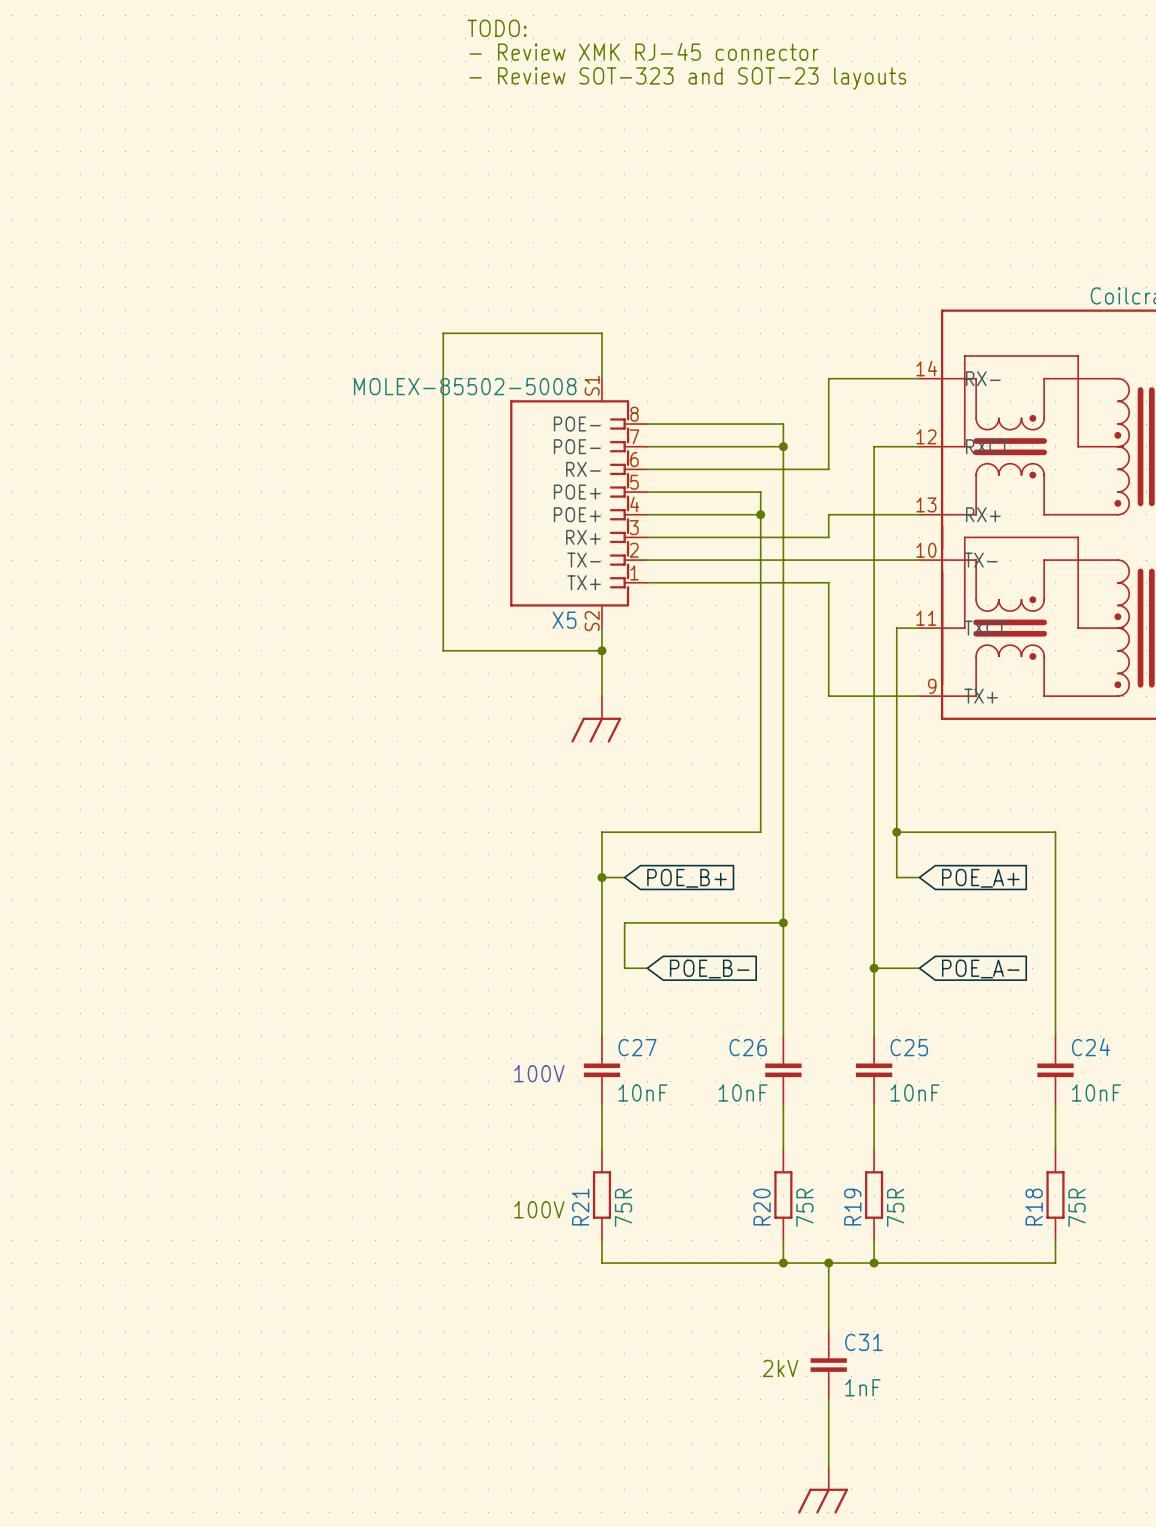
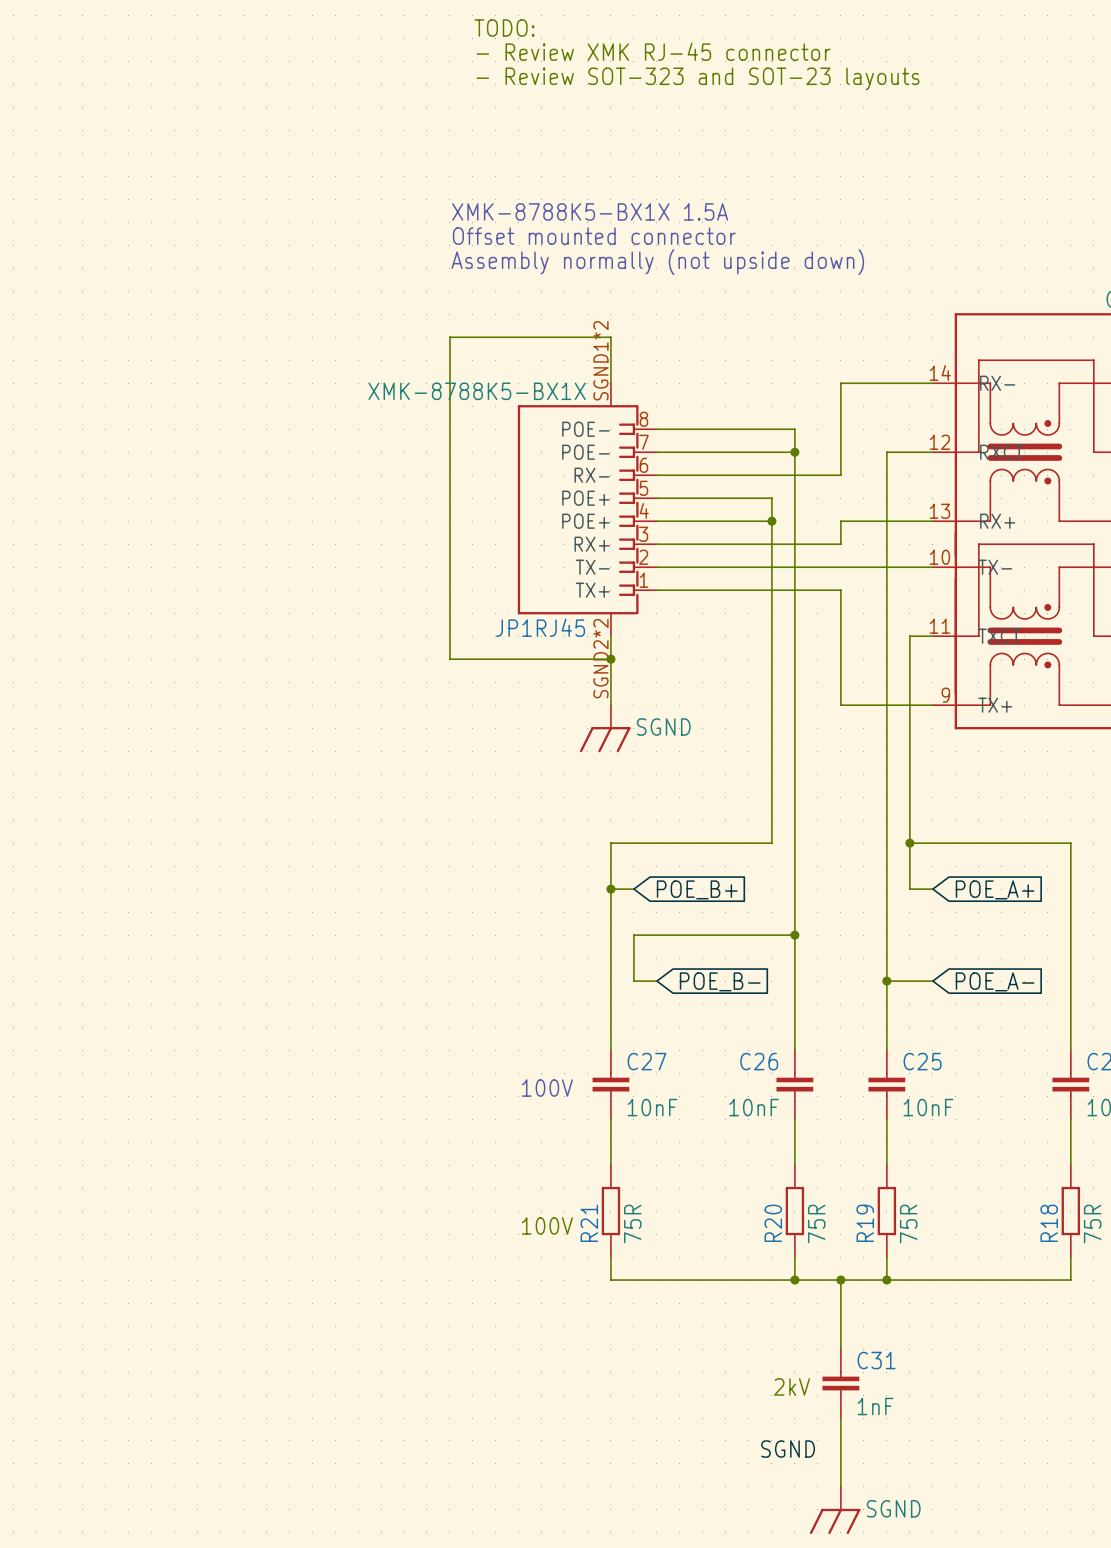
text: none -> XMK-8788K5-BX1X 1.5A (590, 211)
text: none -> Offset mounted connector (594, 236)
text: none -> Assembly normally (not upside down) (657, 262)
X5 pin number: S1 (592, 385) -> SGND1*2 (600, 360)
X5 value: MOLEX-85502-5008 (465, 386) -> XMK-8788K5-BX1X (477, 391)
X5 name: X5 (564, 620) -> JP1RJ45 (540, 627)
X5 pin number: S2 (592, 621) -> SGND2*2 (600, 658)
power symbol text: none -> SGND (663, 727)
label: none -> SGND (788, 1449)
power symbol text: none -> SGND (893, 1508)

